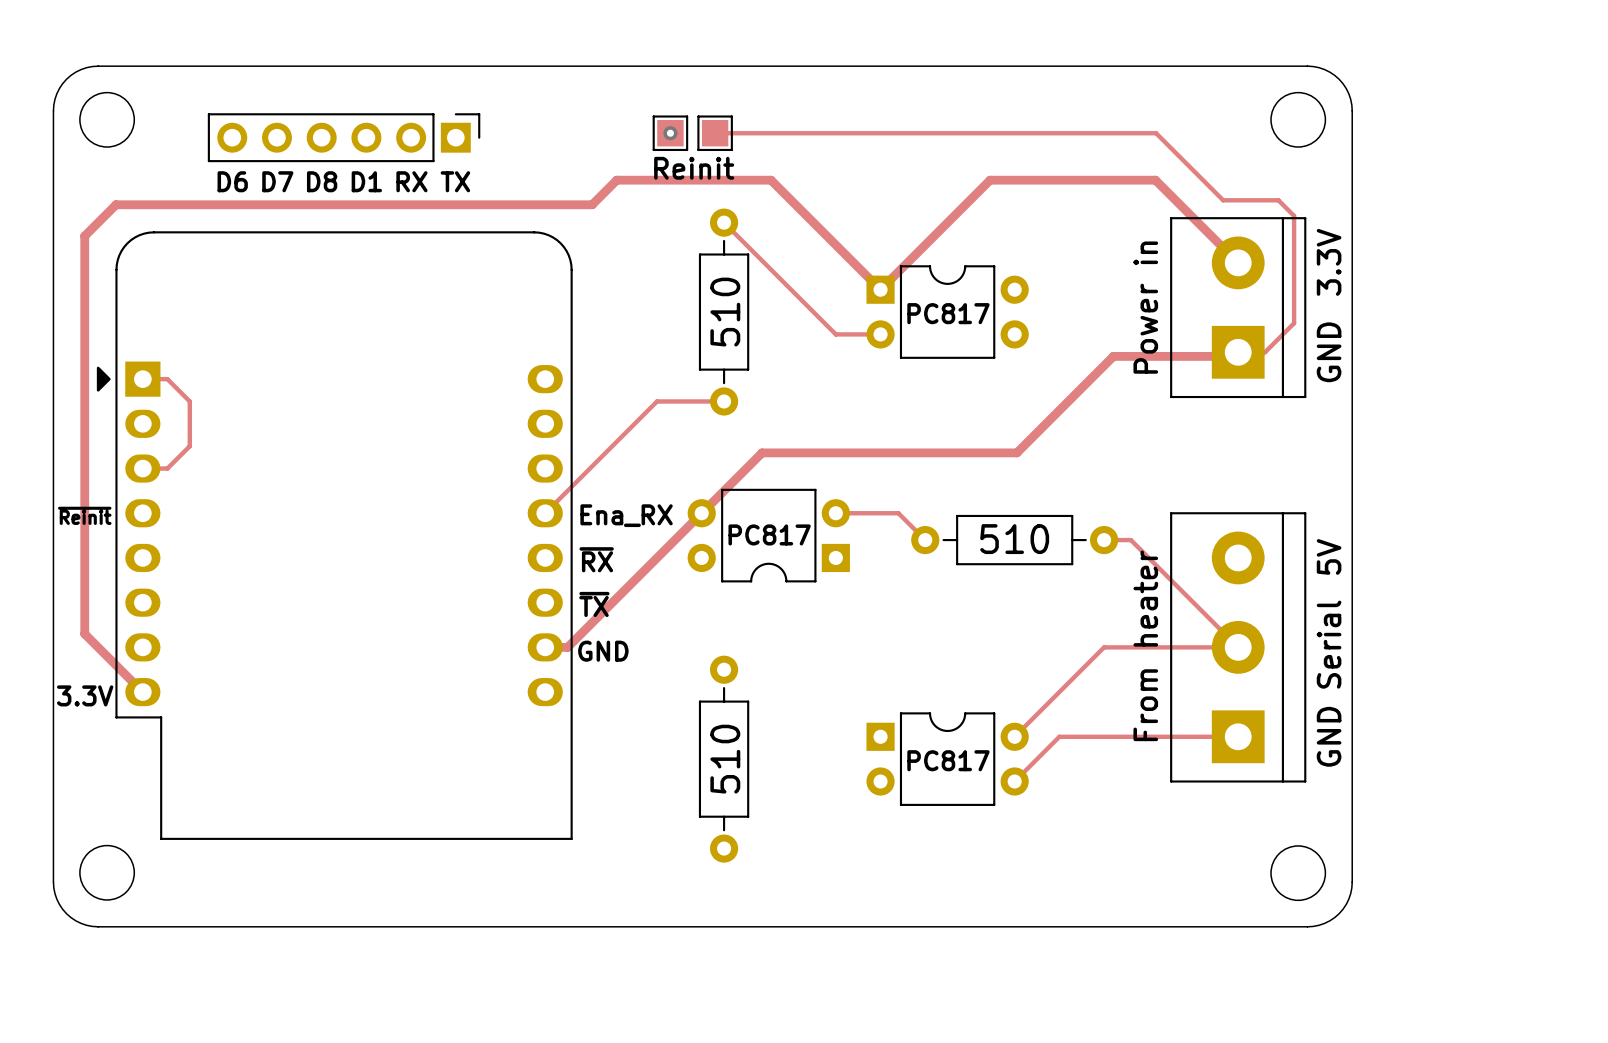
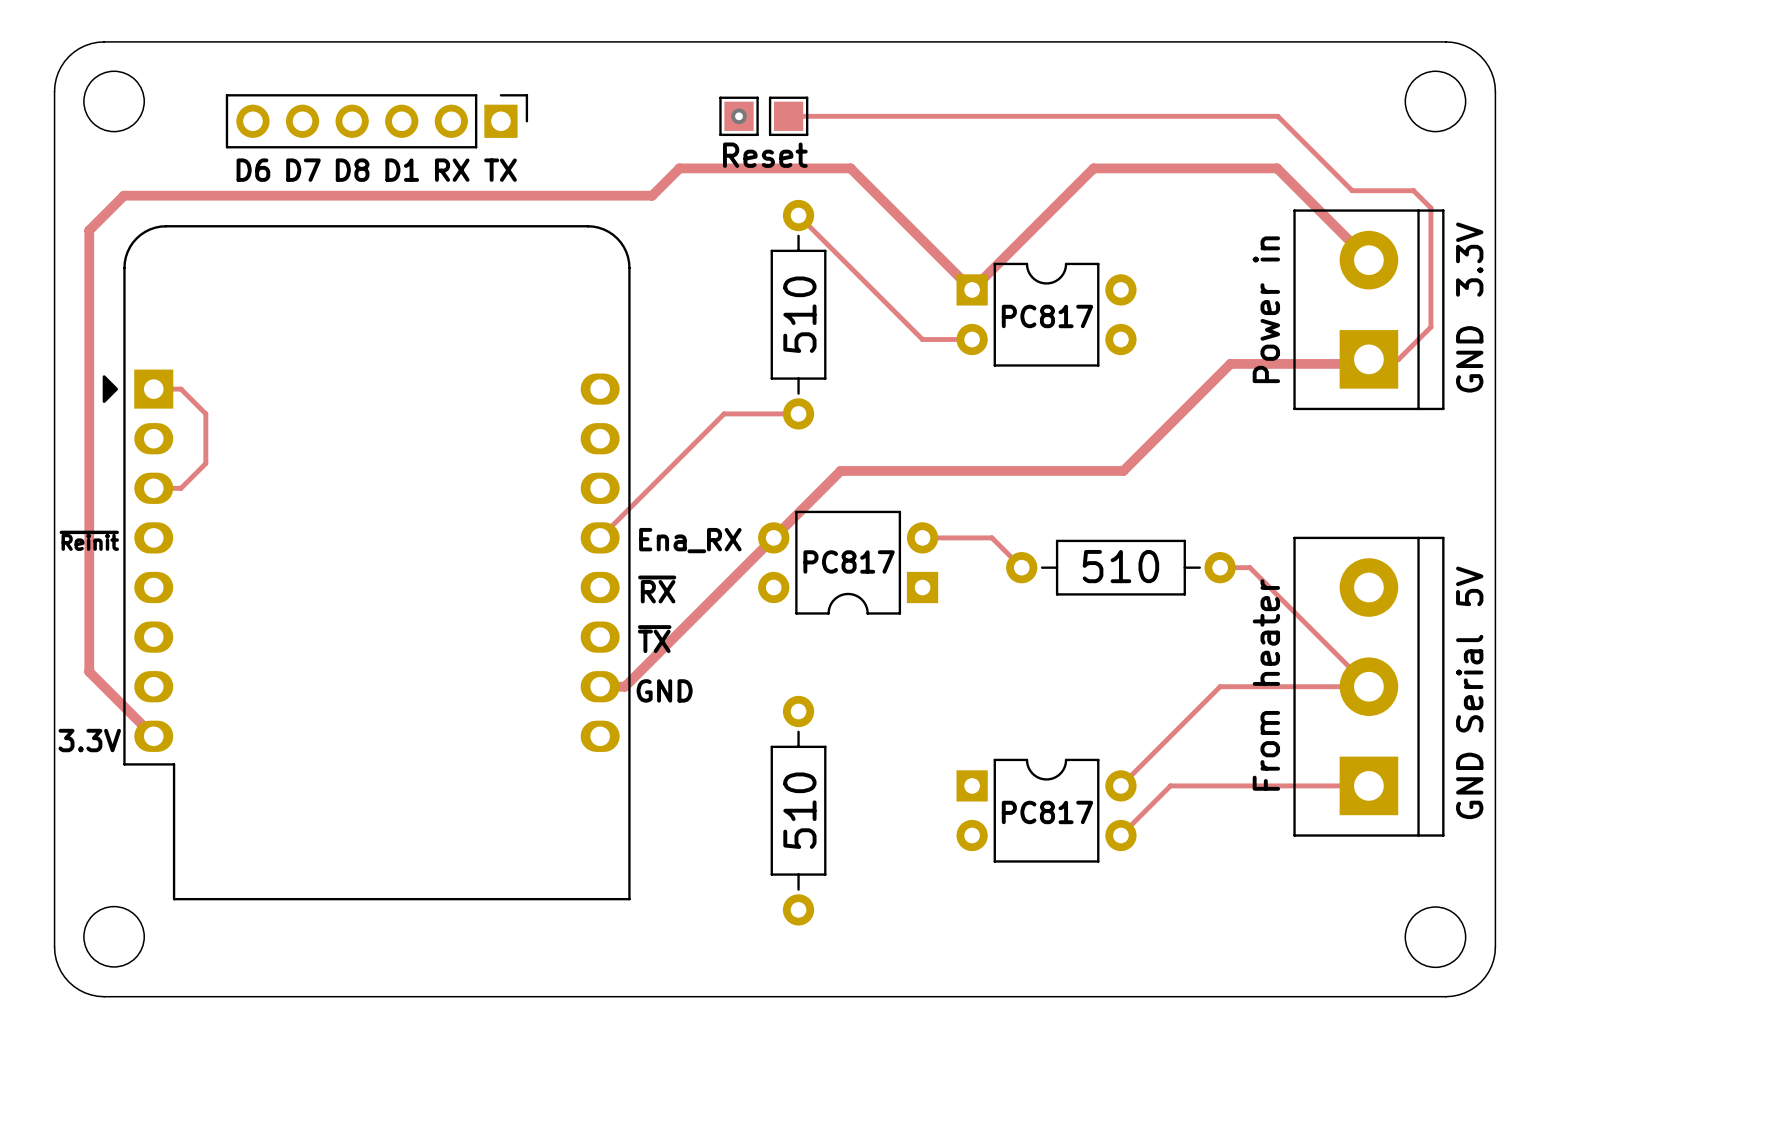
text: Reinit (694, 168) -> Reset (765, 155)

